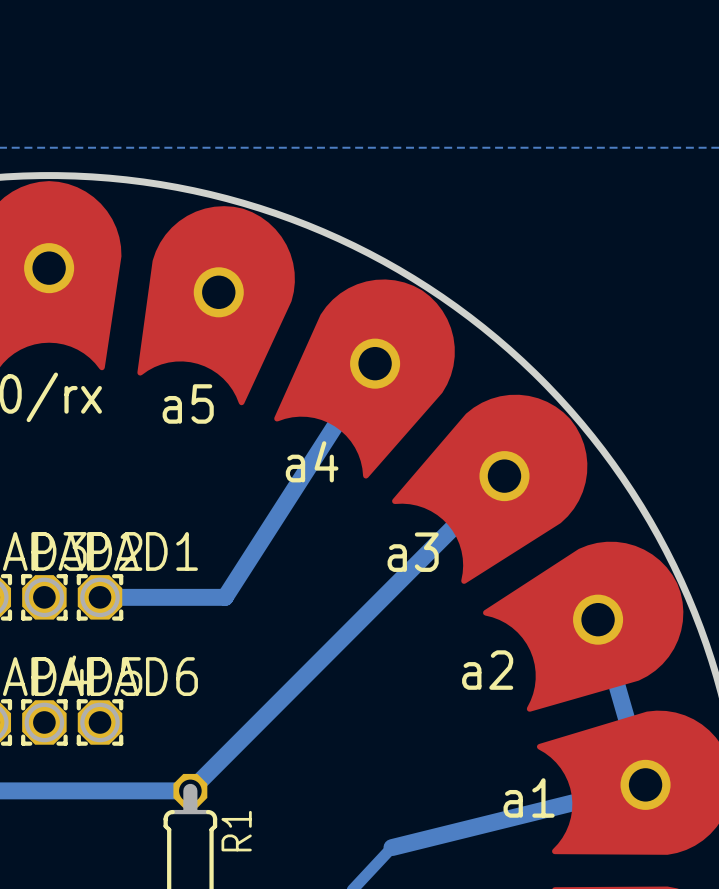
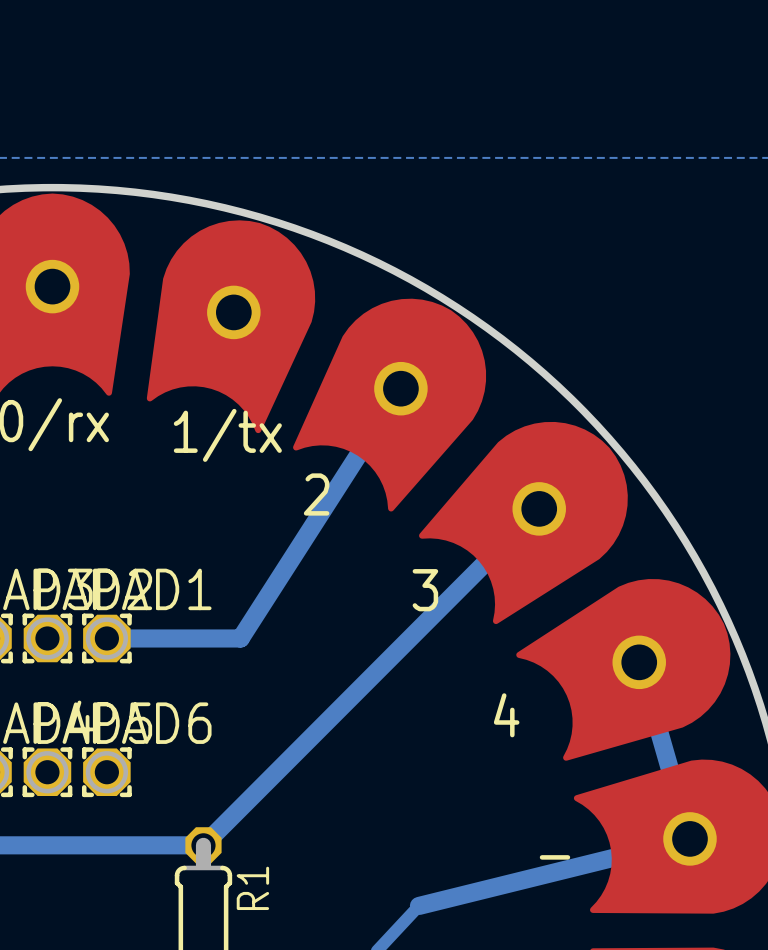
text: a5 (188, 403) -> 1/tx (227, 435)
text: a4 (312, 461) -> 2 (316, 494)
text: a3 (413, 552) -> 3 (425, 590)
text: a2 (487, 670) -> 4 (506, 715)
text: a1 (529, 797) -> - (554, 857)

